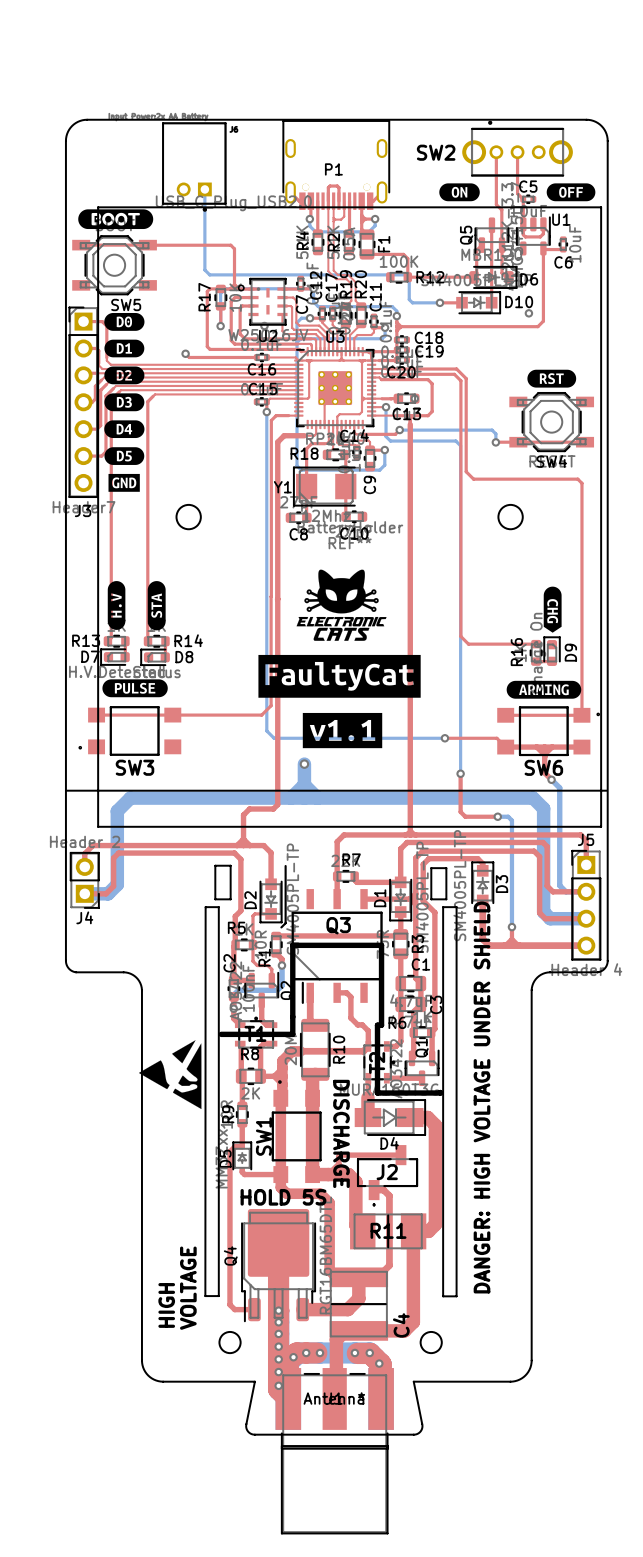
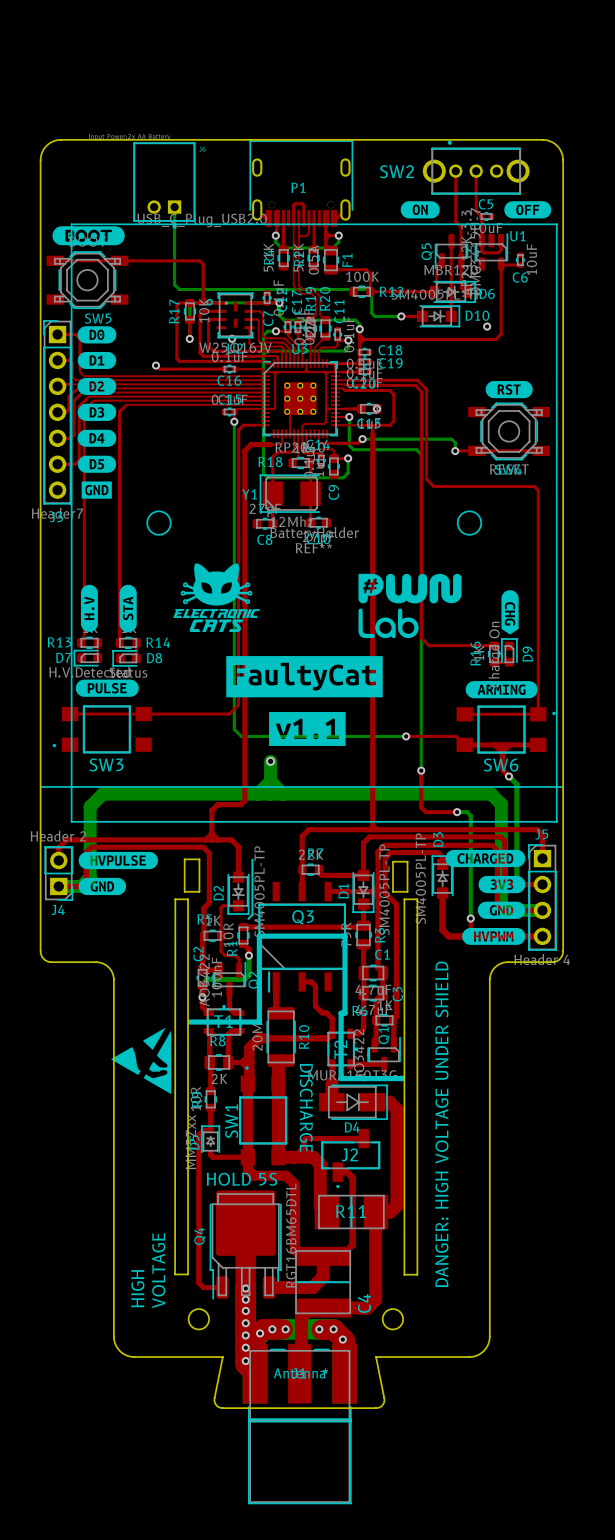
drawing: none -> [358, 573, 462, 639]
drawing position: (341, 605) -> (216, 597)
drawing: none -> [445, 849, 526, 945]
drawing: none -> [78, 851, 158, 896]
D3 name position: D3 (501, 884) -> D3 (438, 839)
text position: DANGER: HIGH VOLTAGE UNDER SHIELD (482, 1097) -> DANGER: HIGH VOLTAGE UNDER SHIELD (441, 1124)

